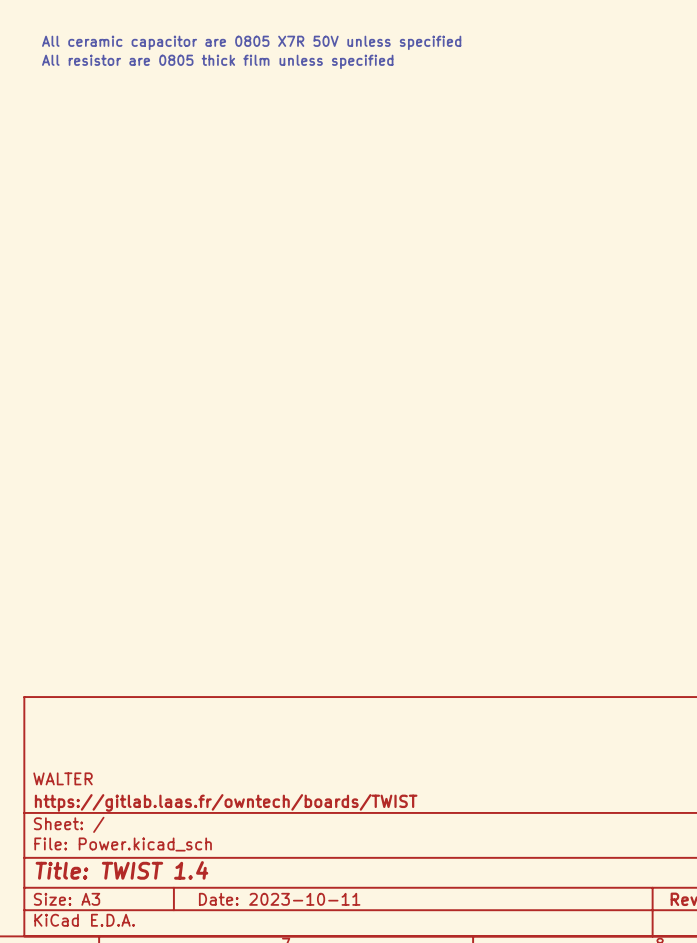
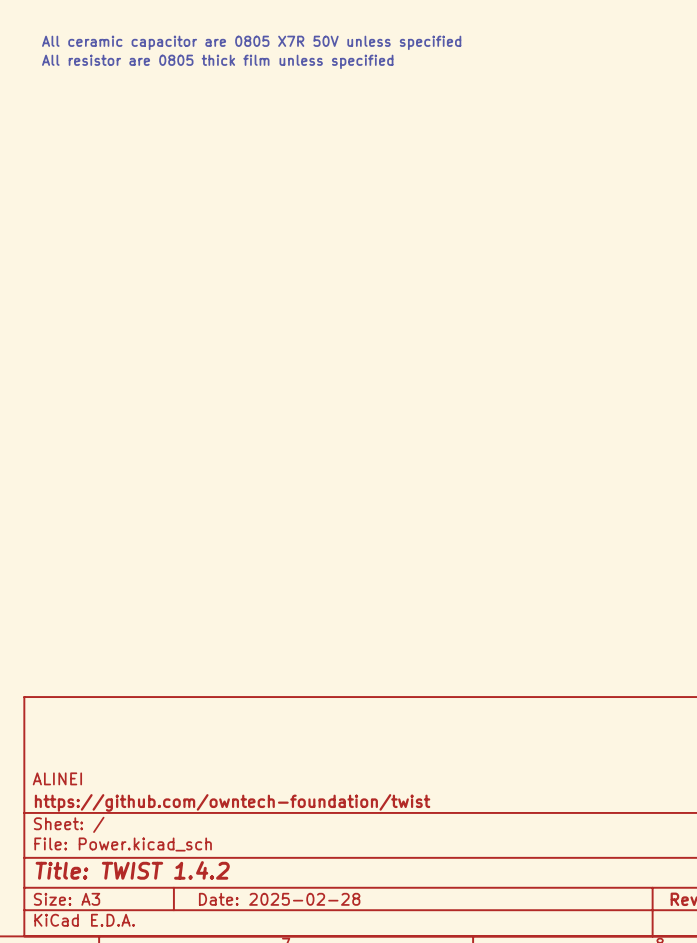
title block: WALTER (63, 778) -> ALINEI (57, 778)
title block: https://gitlab.laas.fr/owntech/boards/TWIST (226, 802) -> https://github.com/owntech-foundation/twist (232, 802)
title block: Title: TWIST 1.4 (121, 870) -> Title: TWIST 1.4.2 (132, 870)
title block: Date: 2023-10-11 (279, 899) -> Date: 2025-02-28 (279, 899)

